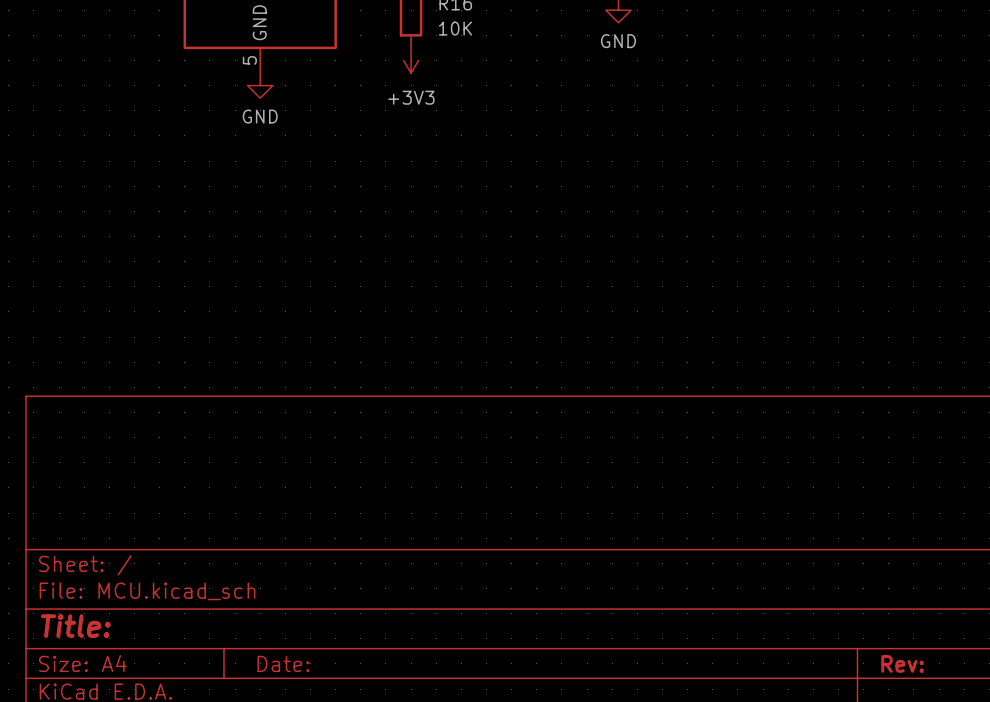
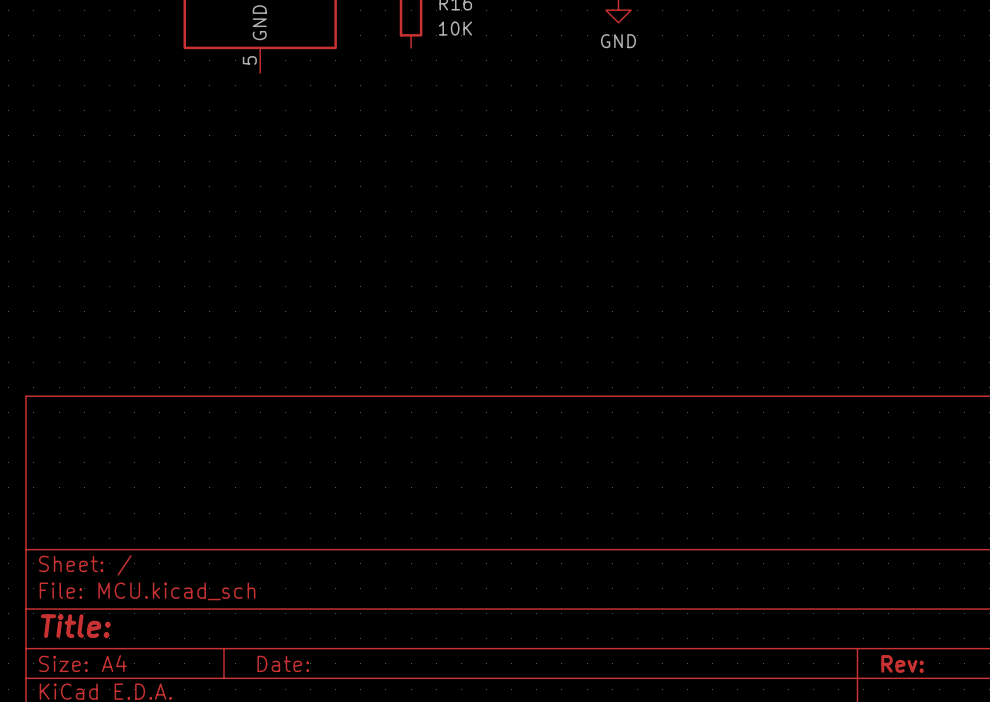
power symbol: +3V3 (411, 60) -> none
power symbol: GND (260, 85) -> none

